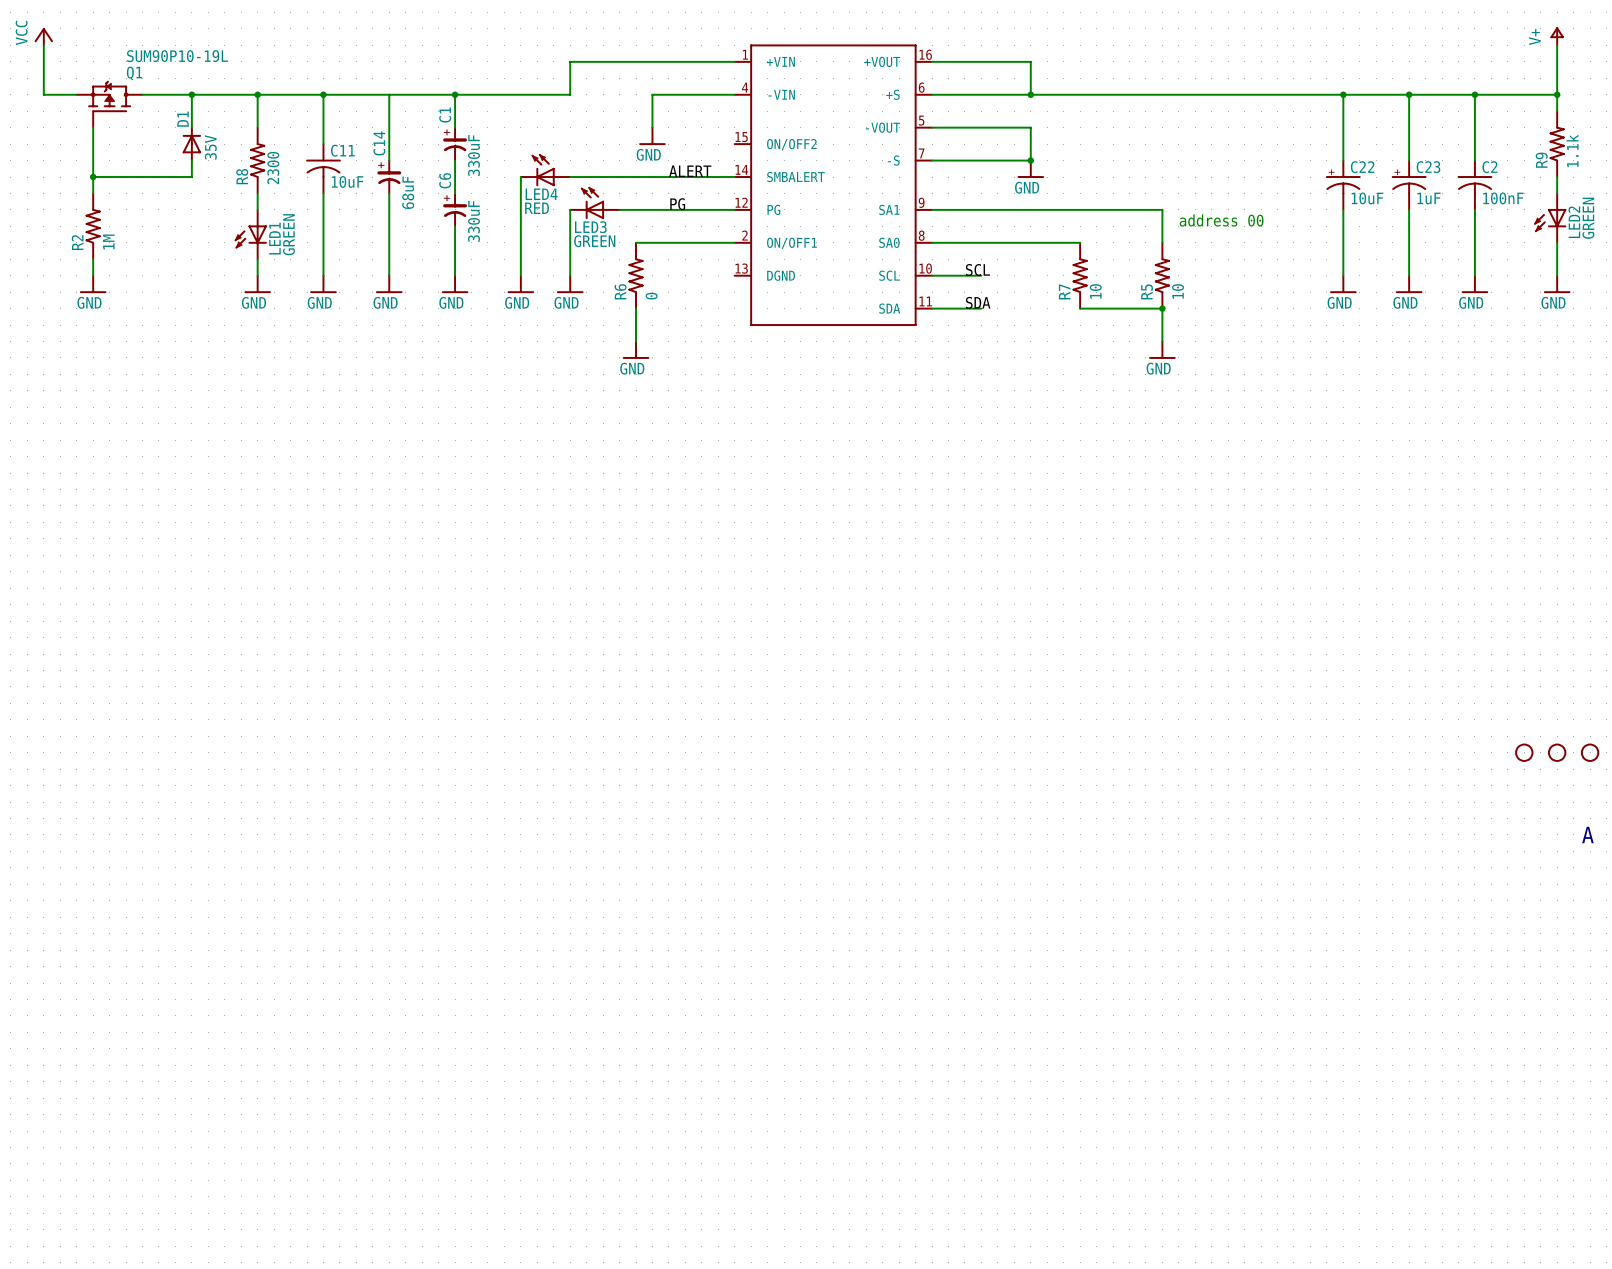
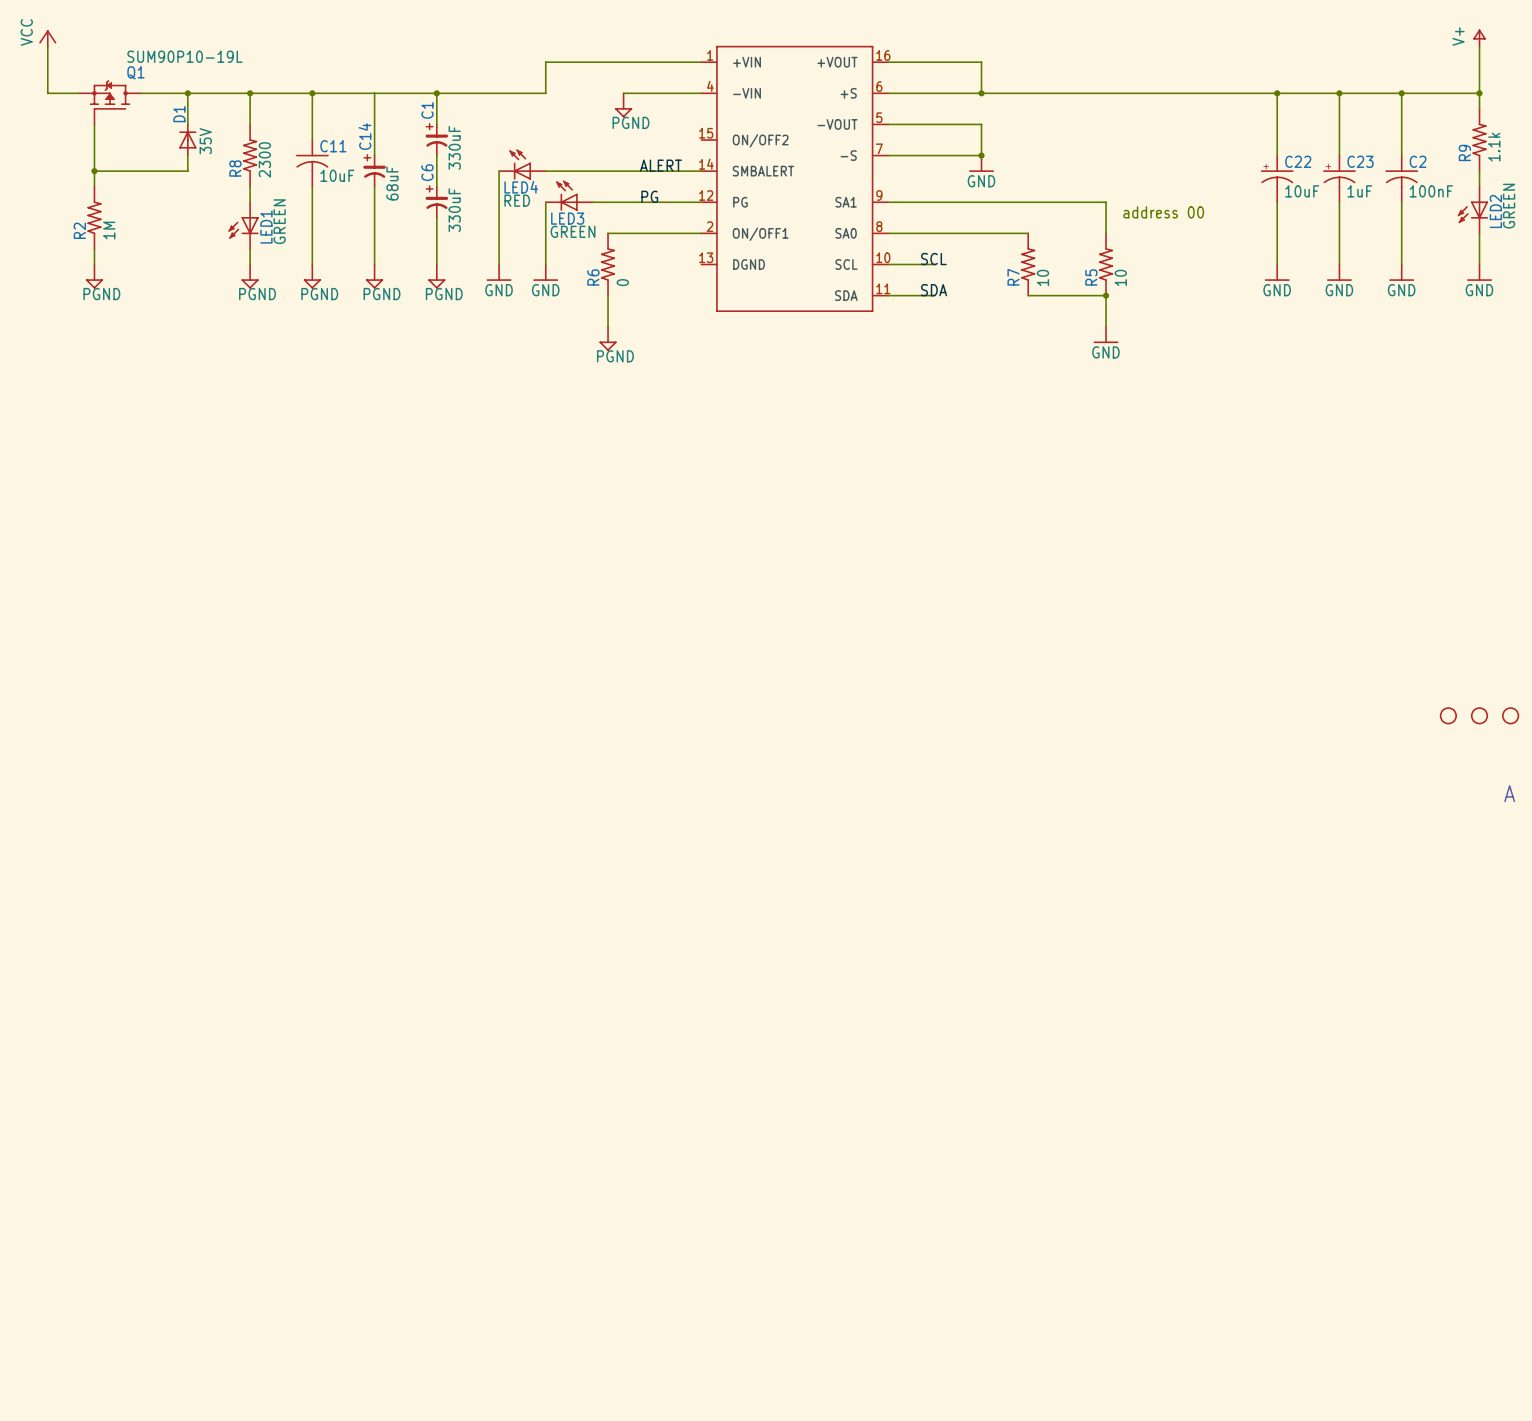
power symbol: none -> PGND (623, 105)
power symbol: GND (652, 136) -> none
power symbol: GND (93, 284) -> PGND (94, 276)
power symbol: GND (257, 284) -> PGND (250, 276)
power symbol: GND (323, 284) -> PGND (312, 276)
power symbol: GND (389, 284) -> PGND (374, 276)
power symbol: GND (455, 284) -> PGND (436, 276)
power symbol: GND (636, 350) -> PGND (608, 338)

